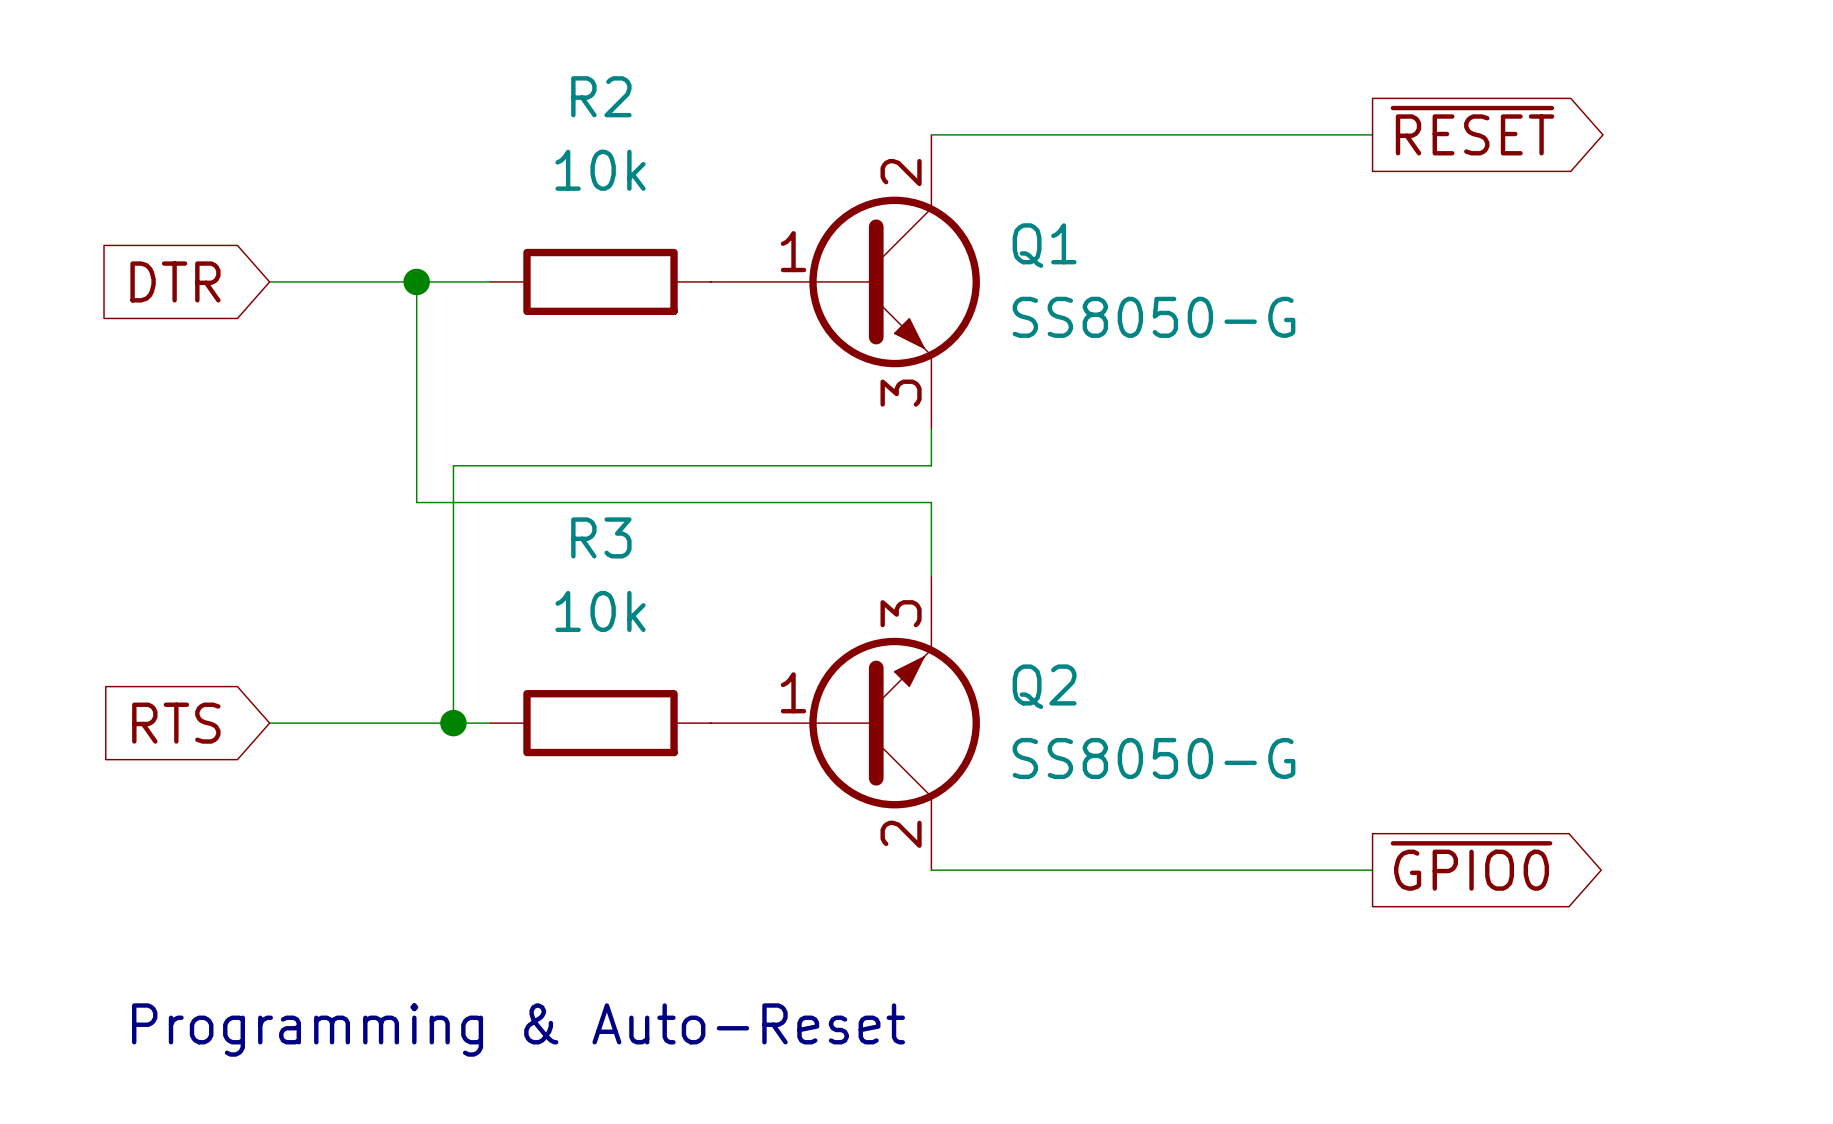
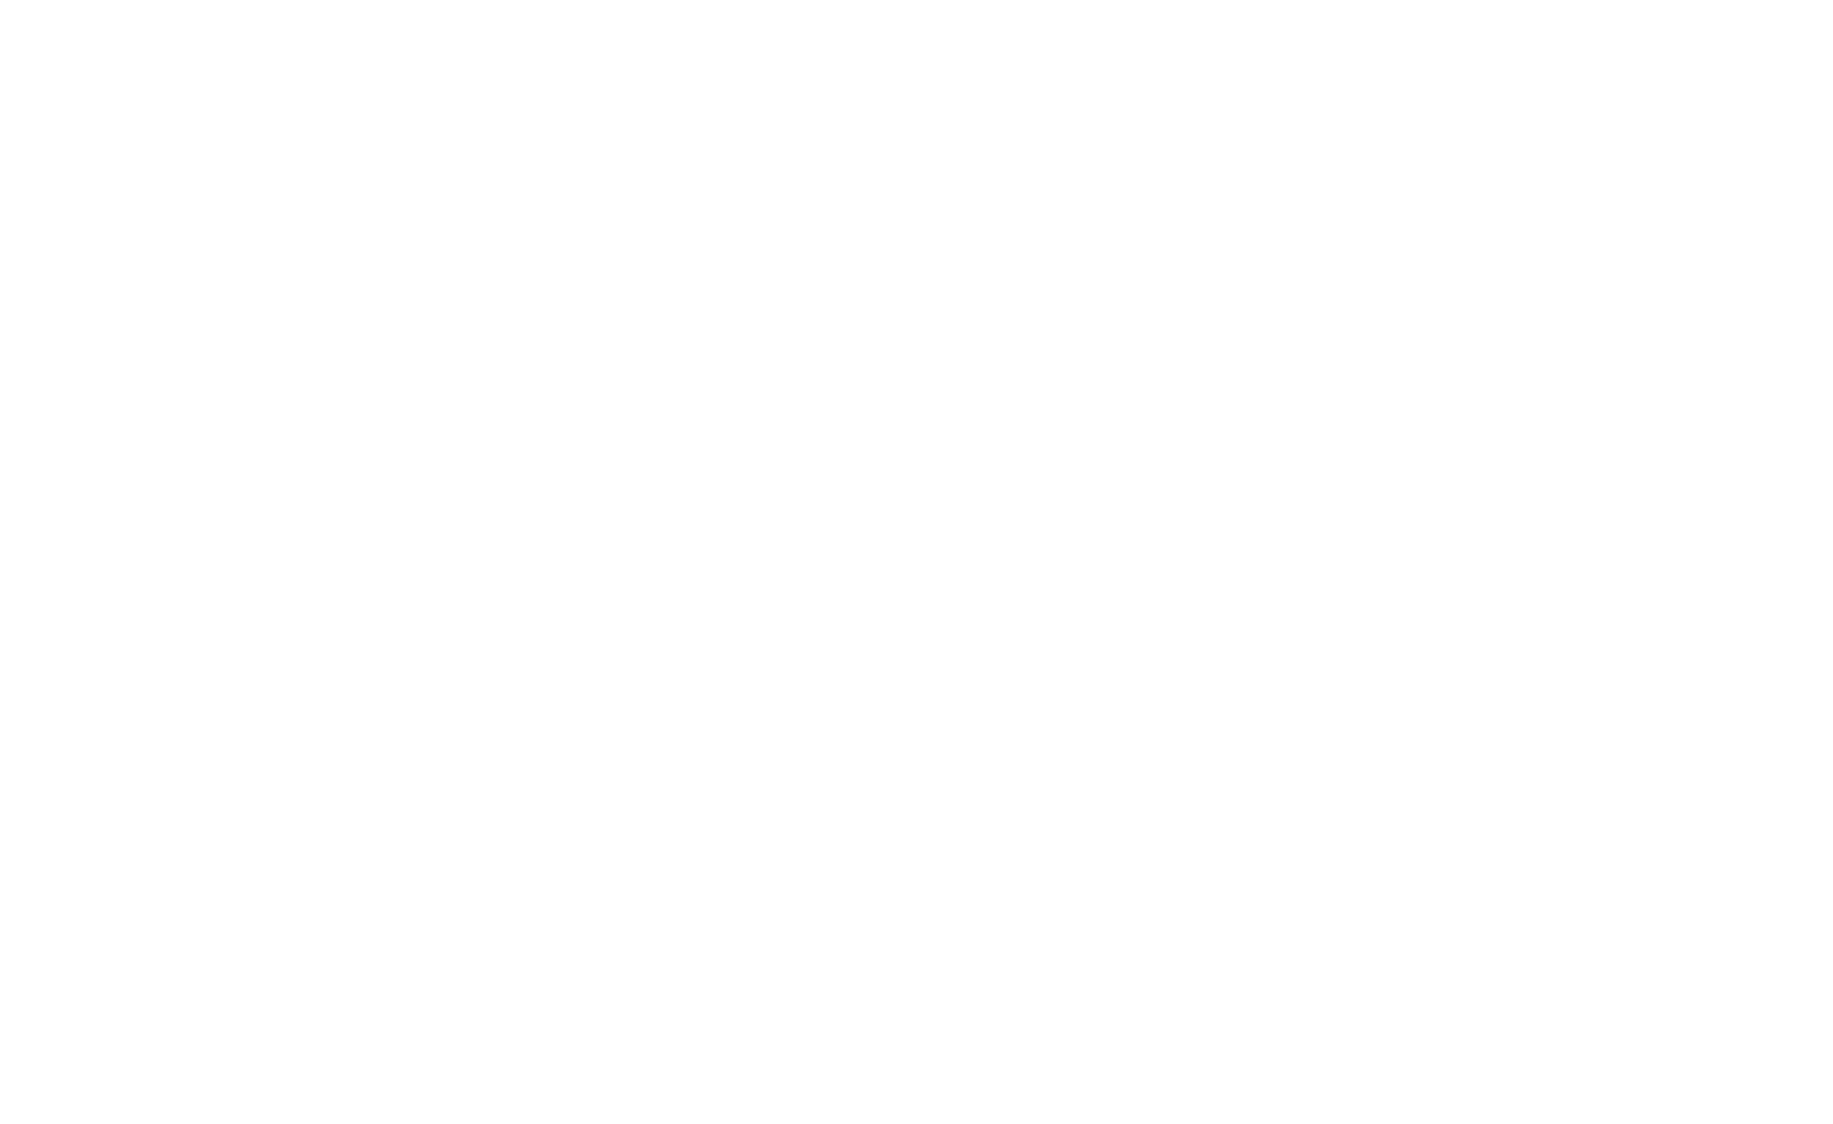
global label: ~{RESET} (1472, 130) -> none
wire: (931, 134) (1372, 134) -> none
global label: DTR (175, 281) -> none
wire: (269, 281) (490, 281) -> none
wire: (416, 281) (416, 502) (931, 502) (931, 576) -> none
junction: (416, 281) -> none
R2: 10k (600, 281) -> none
Q1: SS8050-G (845, 281) -> none
wire: (931, 429) (931, 465) (453, 465) (453, 723) -> none
global label: RTS (176, 723) -> none
wire: (269, 723) (490, 723) -> none
junction: (453, 723) -> none
R3: 10k (600, 723) -> none
Q2: SS8050-G (845, 723) -> none
global label: ~{GPIO0} (1471, 865) -> none
wire: (931, 870) (1372, 870) -> none
text: Programming & Auto-Reset (518, 1030) -> none

